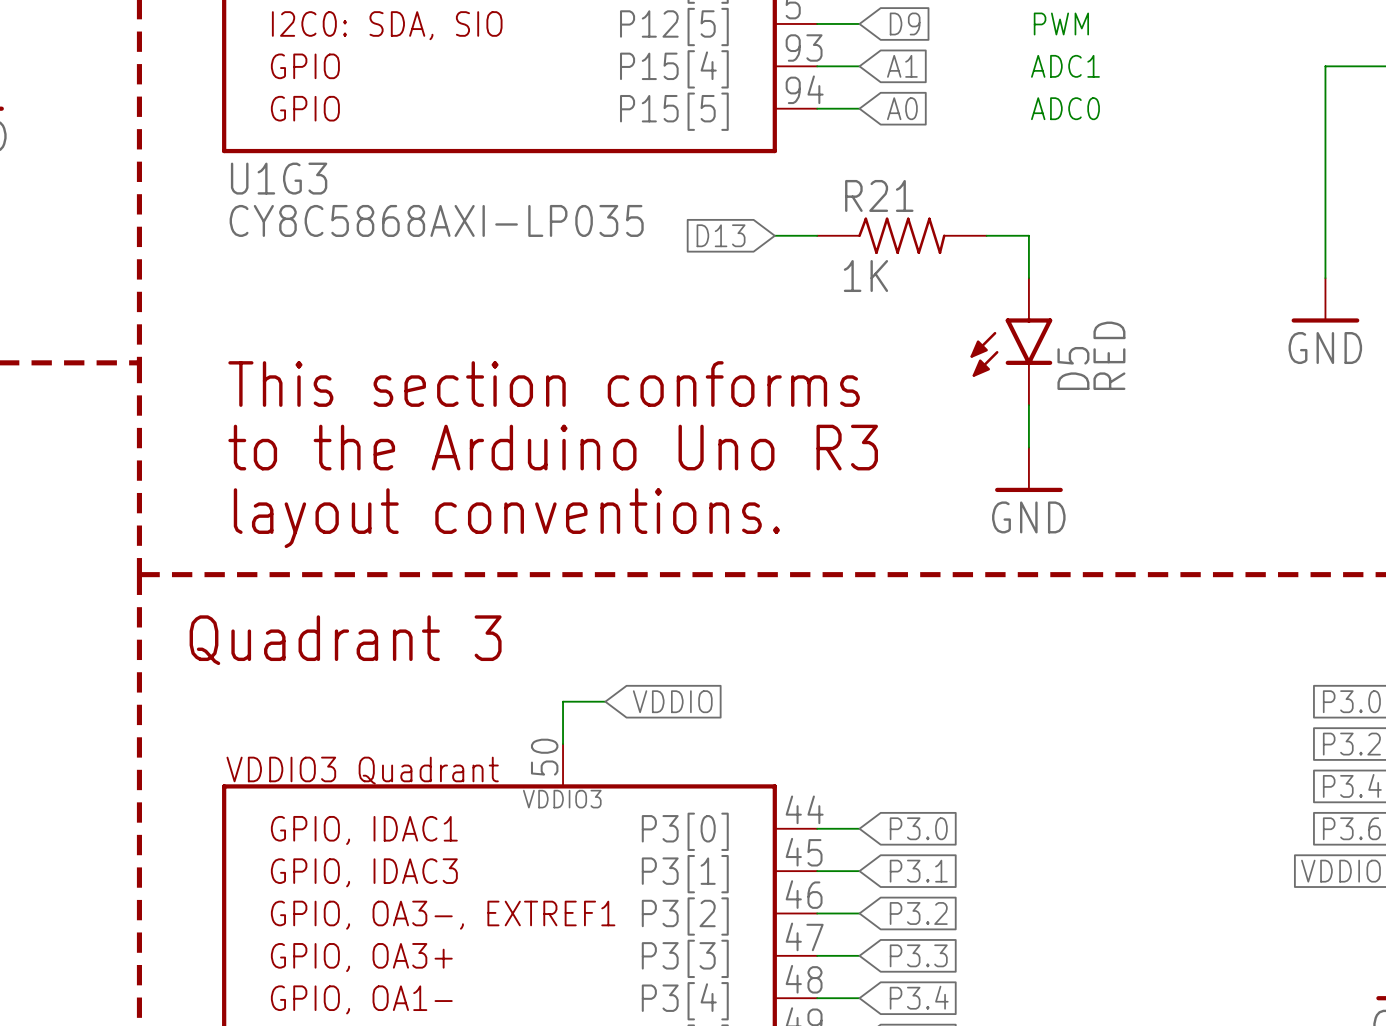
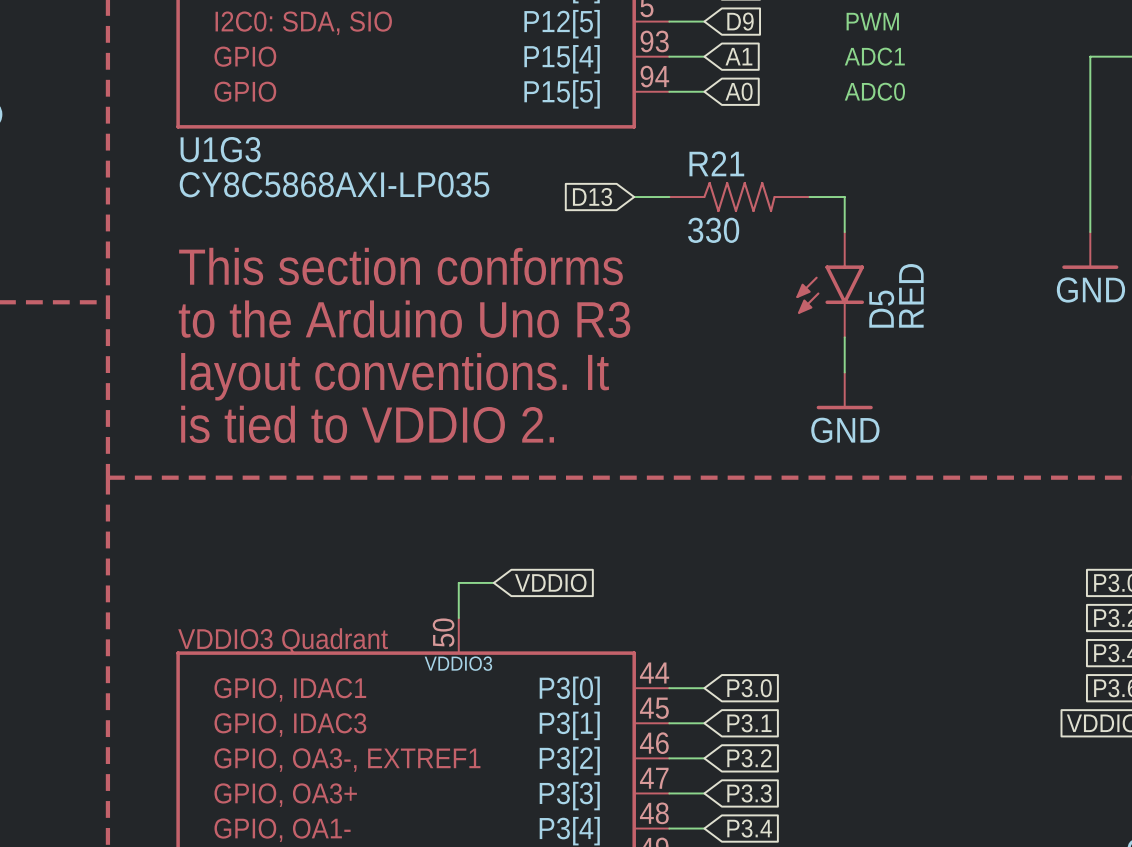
R21 value: 1K (865, 276) -> 330 (713, 230)
text: none -> This section conforms (400, 266)
text: This section conforms (544, 384) -> to the Arduino Uno R3 (404, 319)
text: to the Arduino Uno R3 (553, 447) -> layout conventions. It (395, 376)
text: layout conventions. (506, 518) -> is tied to VDDIO 2. (367, 424)
text: Quadrant 3 (345, 640) -> none

